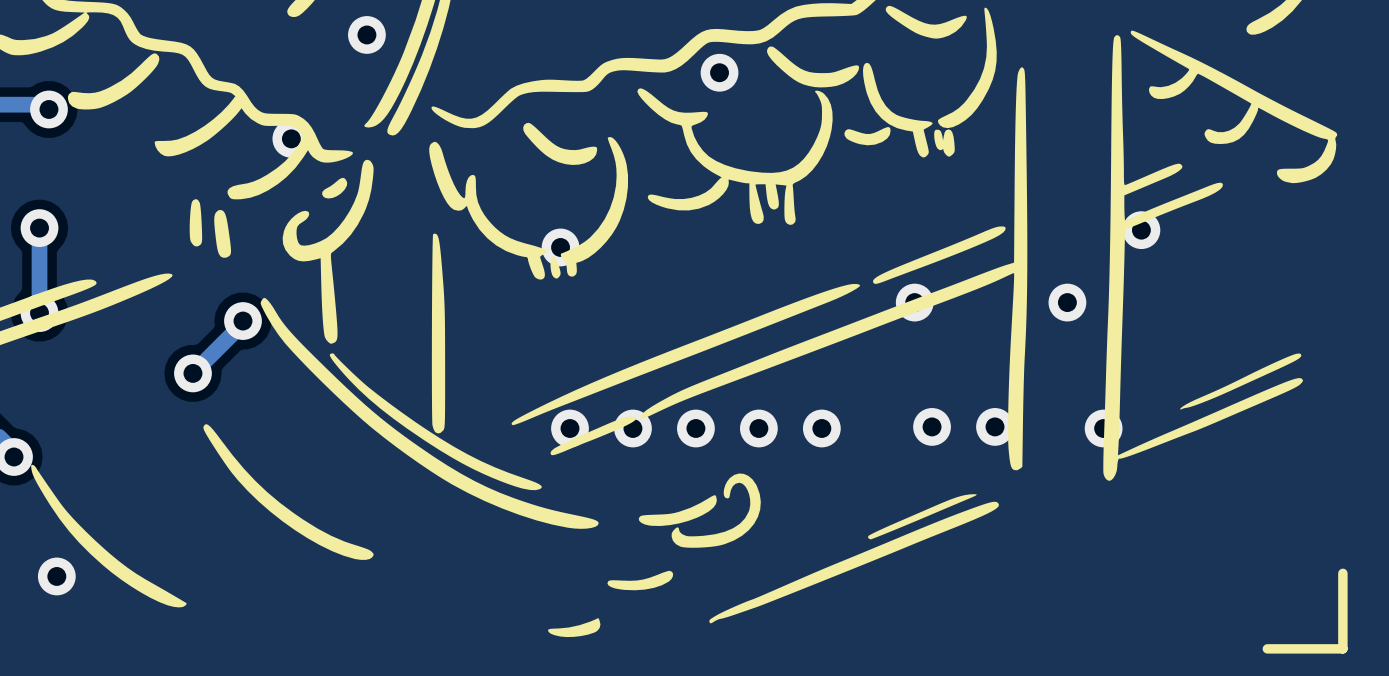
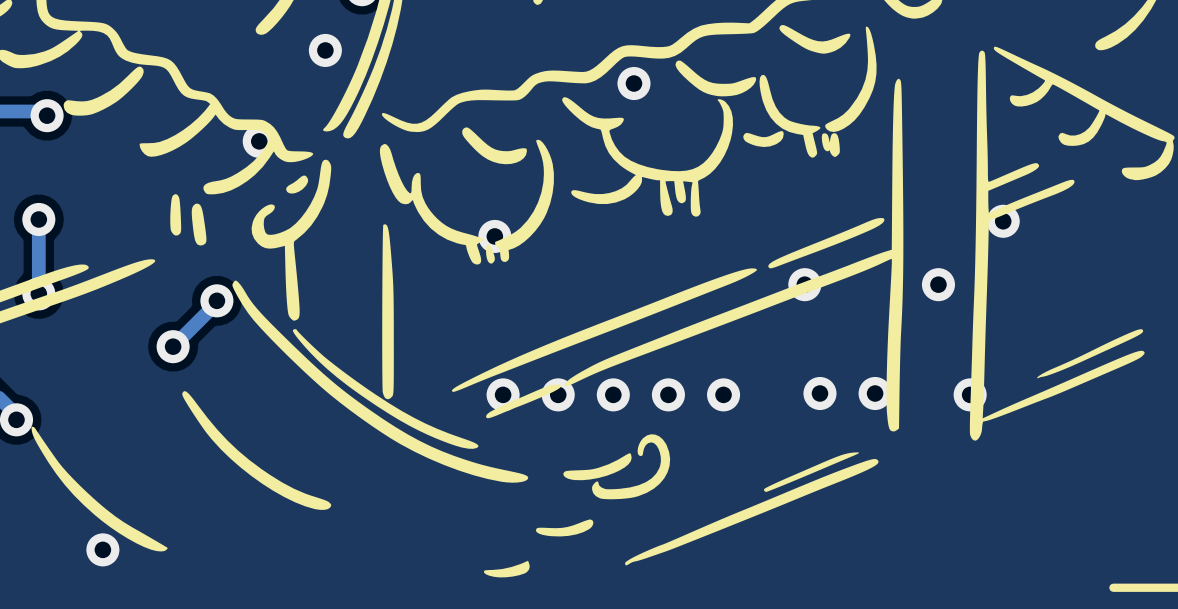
via position: (56, 576) -> (102, 549)

